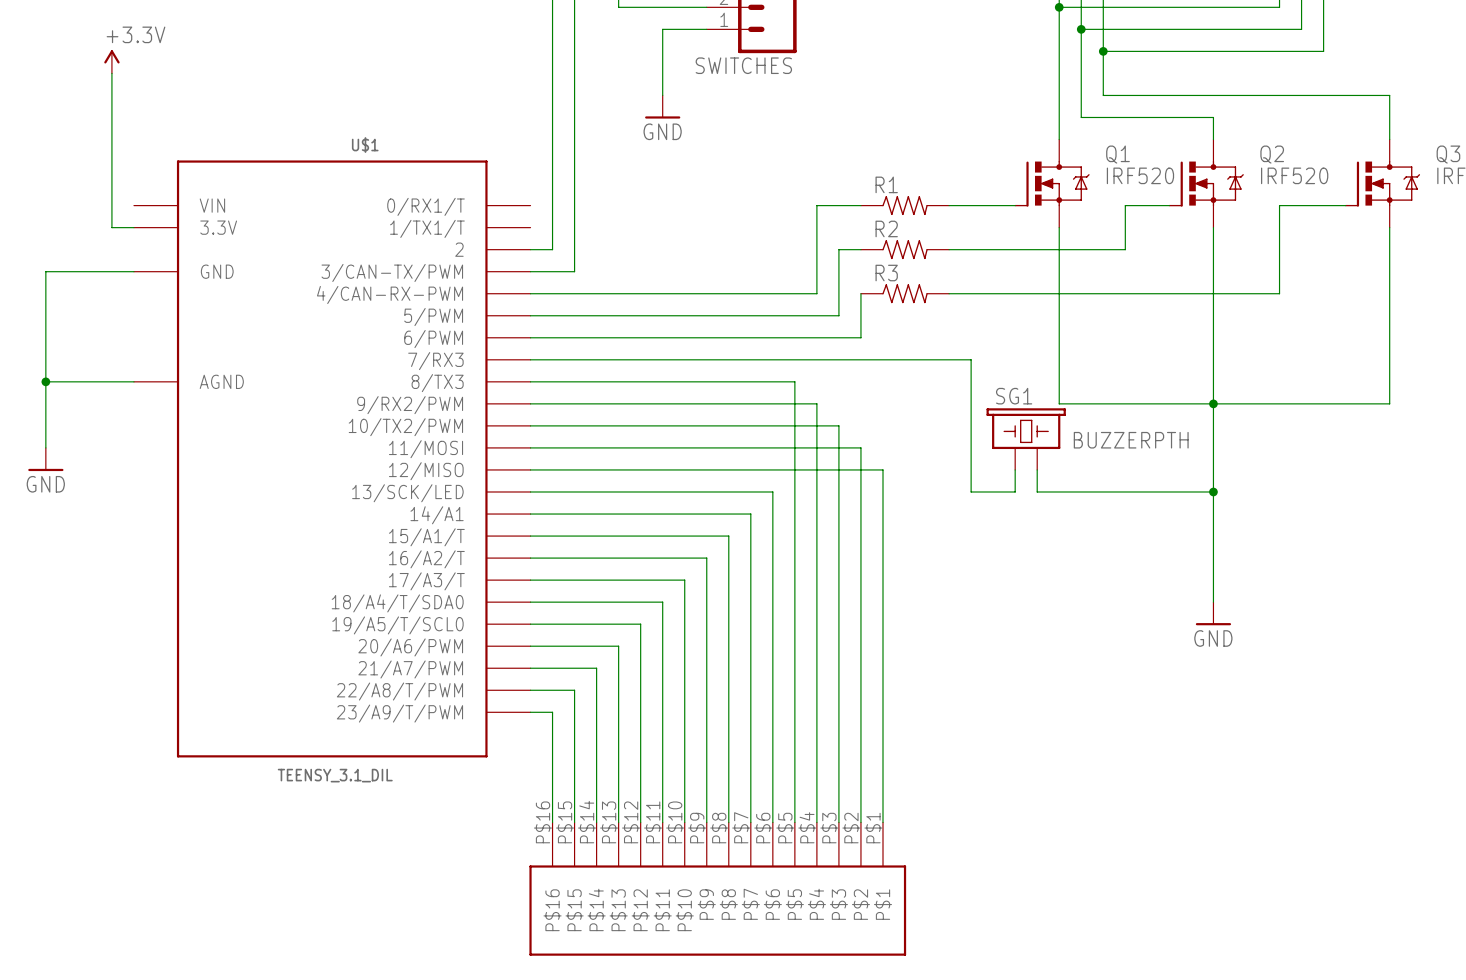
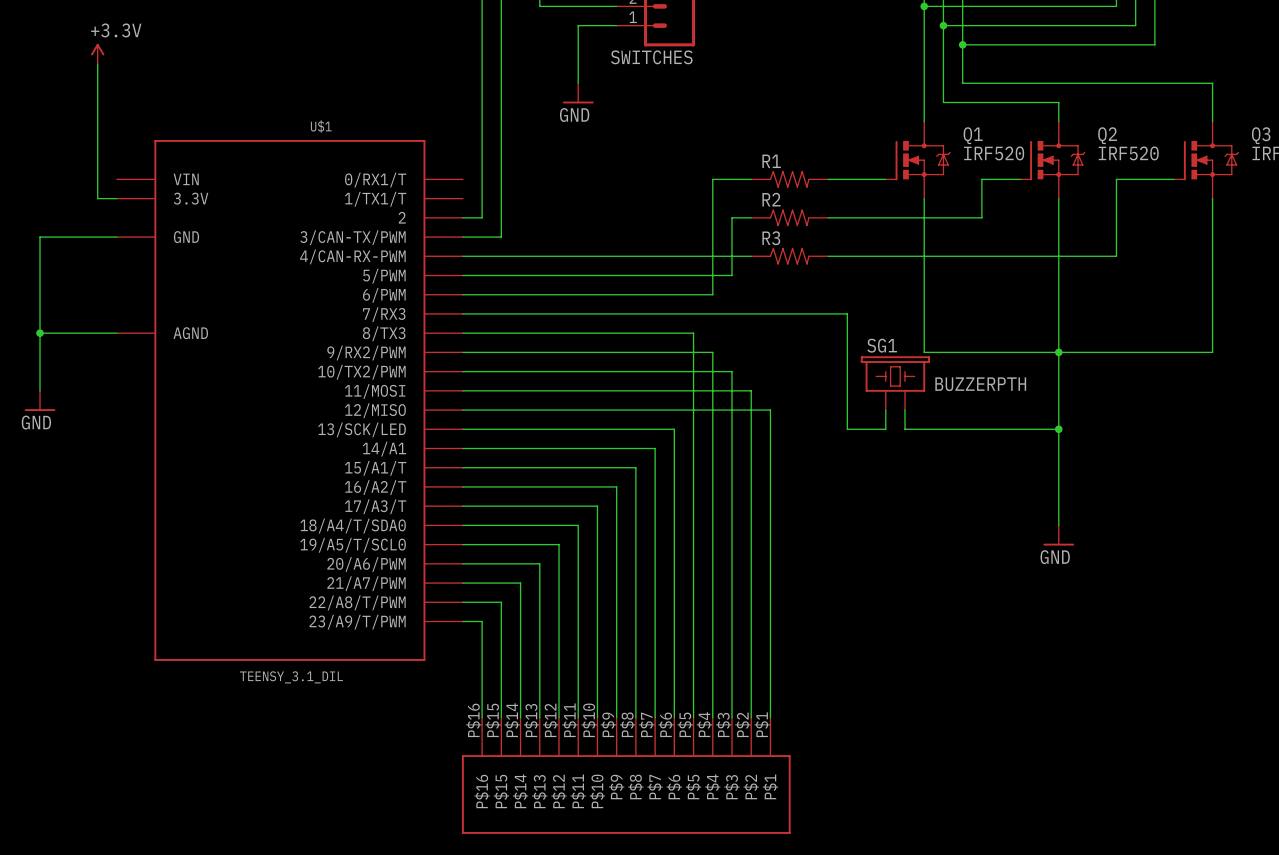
wire: (860, 293) (860, 337) (816, 337) -> (751, 256) (712, 256) (712, 294)

